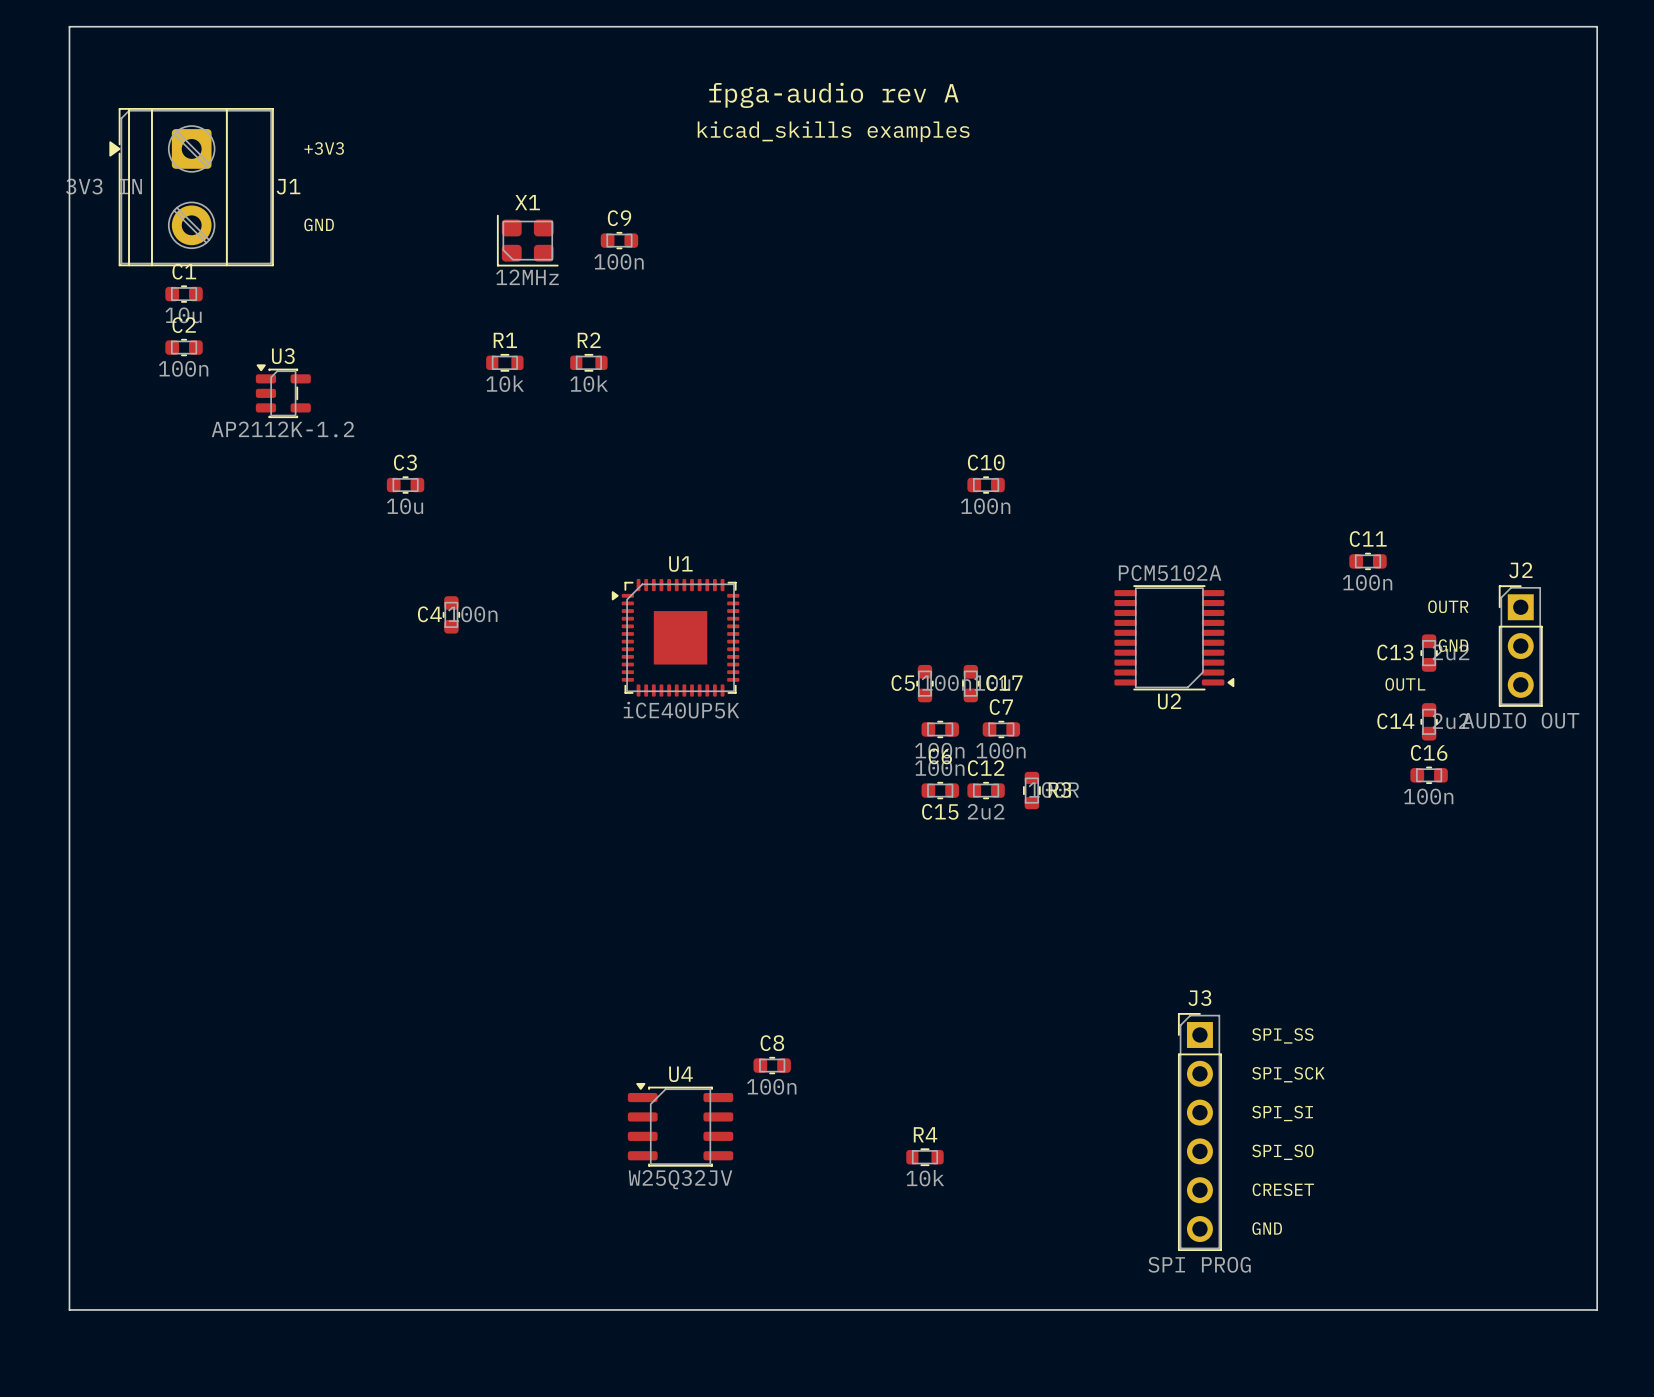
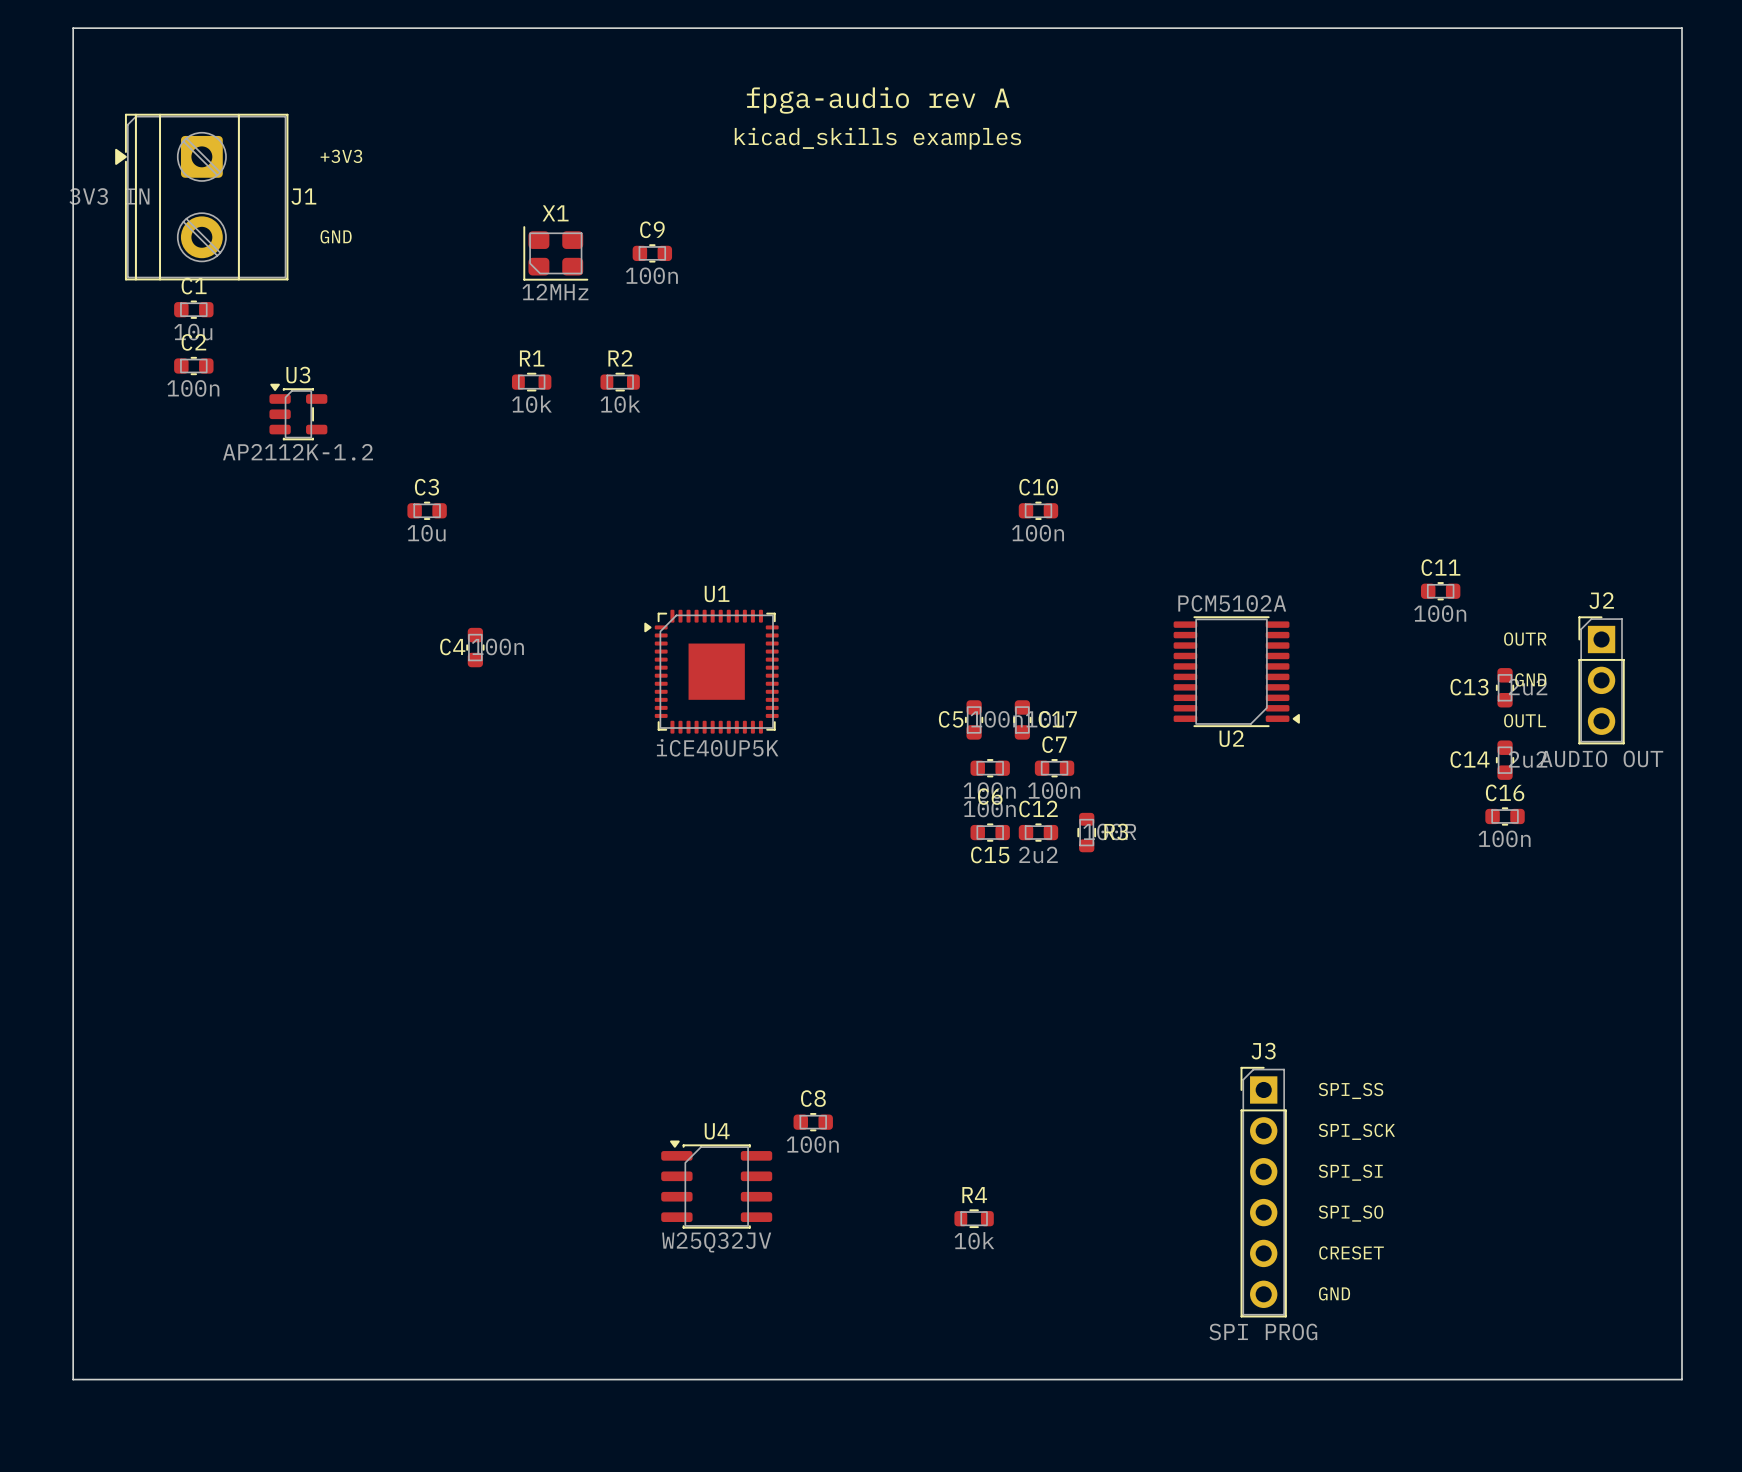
text position: OUTL (1405, 684) -> OUTL (1525, 720)

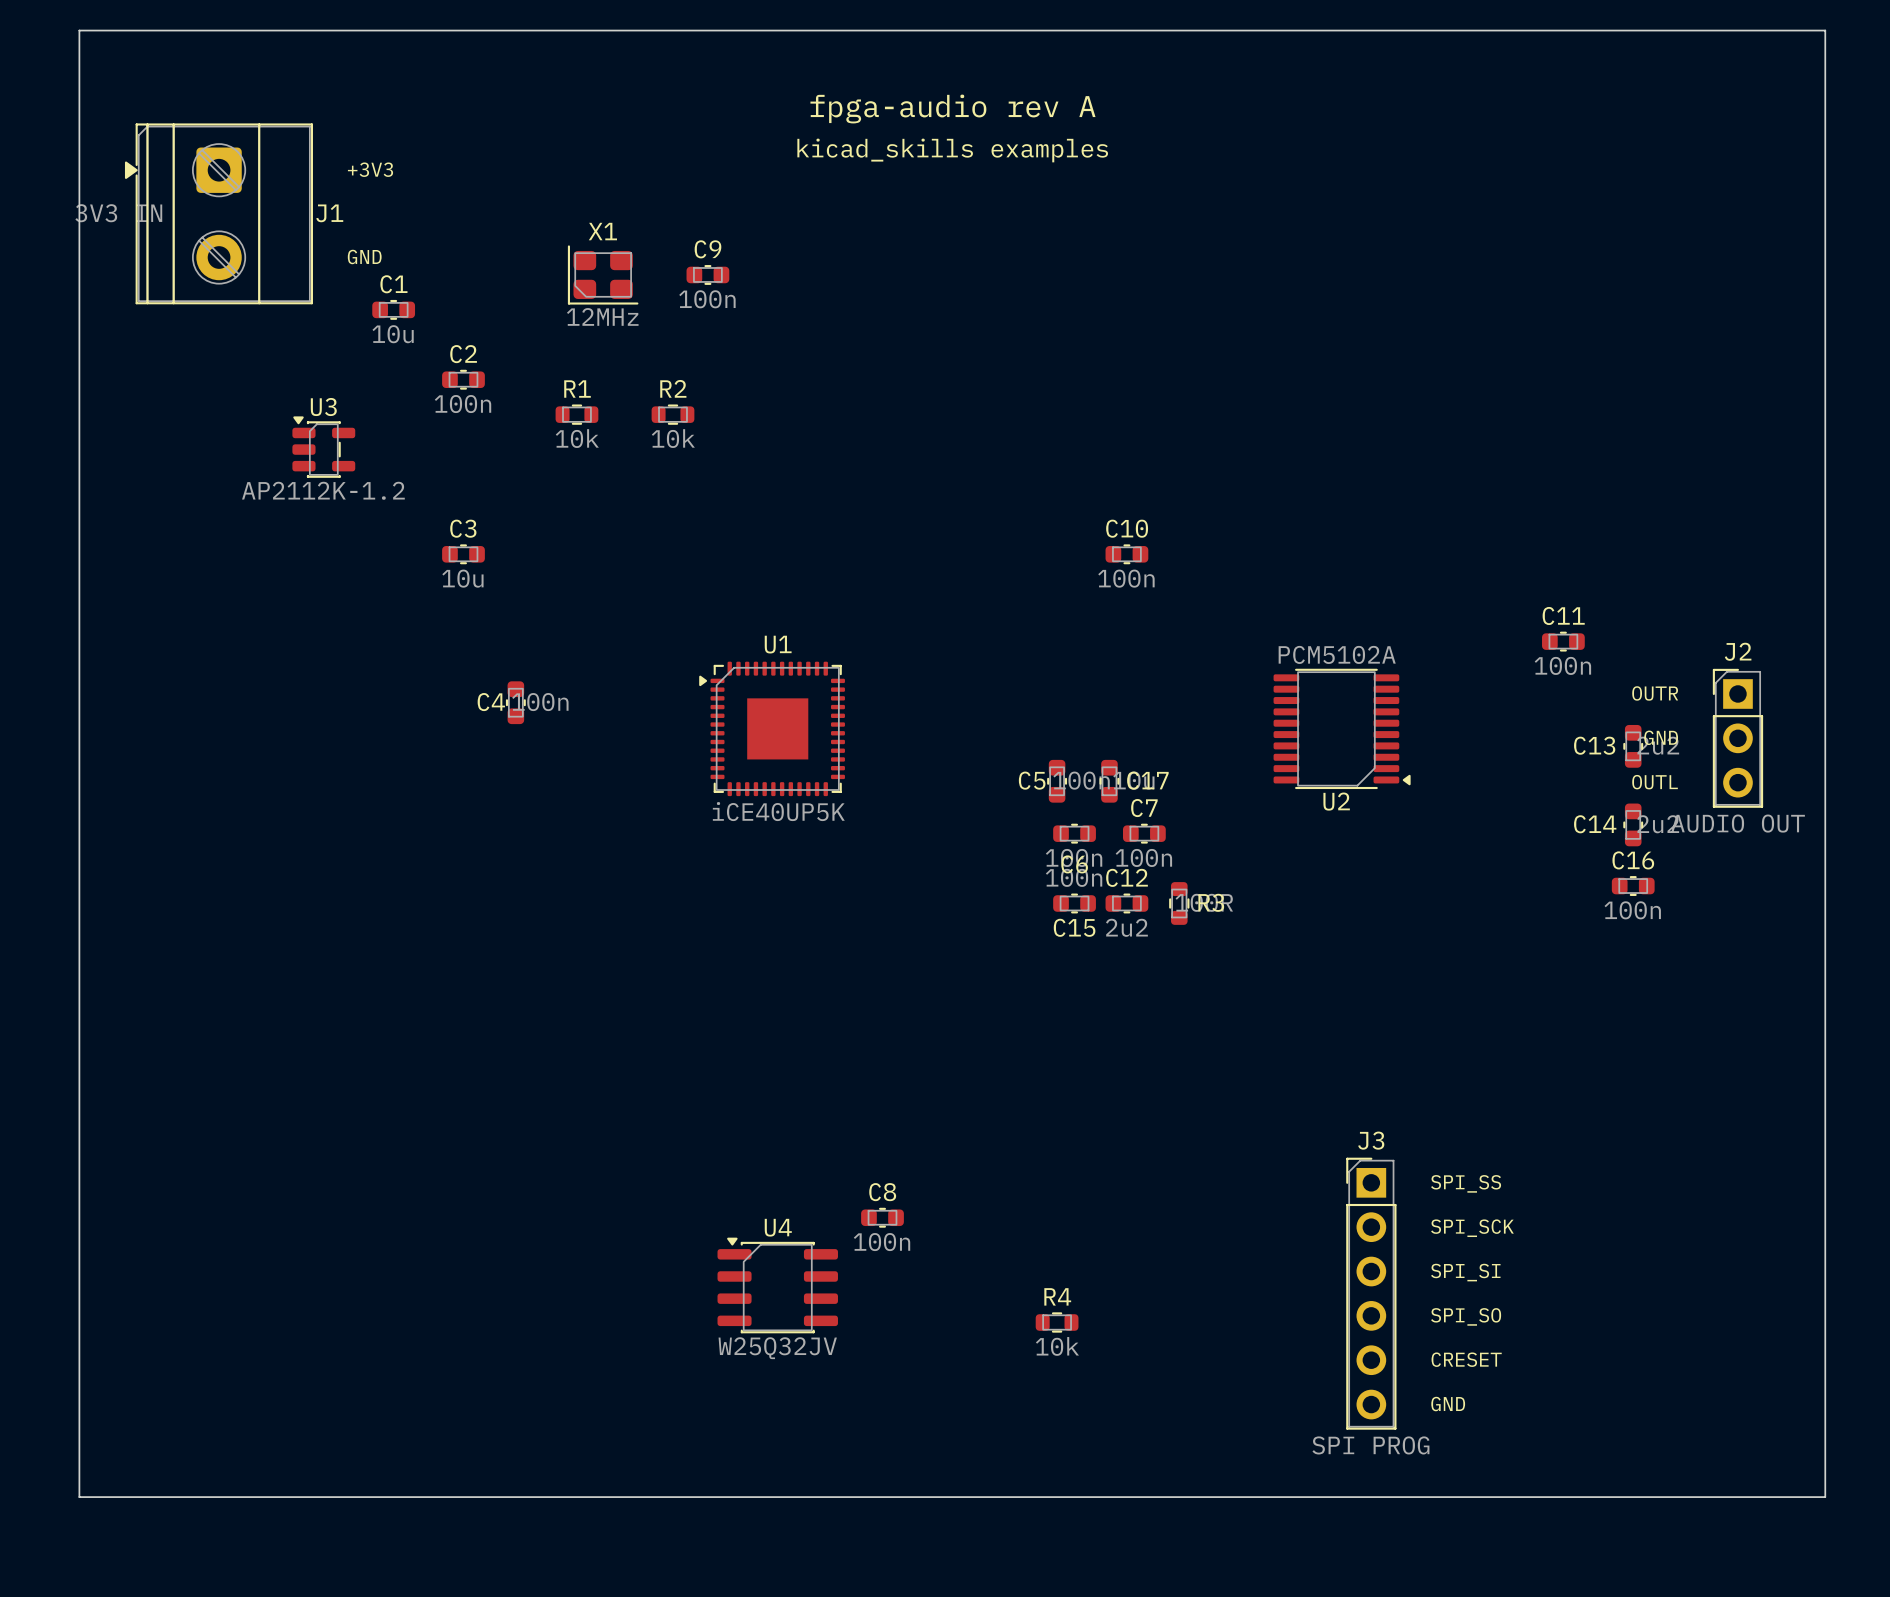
C1 position: (193, 309) -> (393, 309)
C2 position: (193, 366) -> (463, 379)

